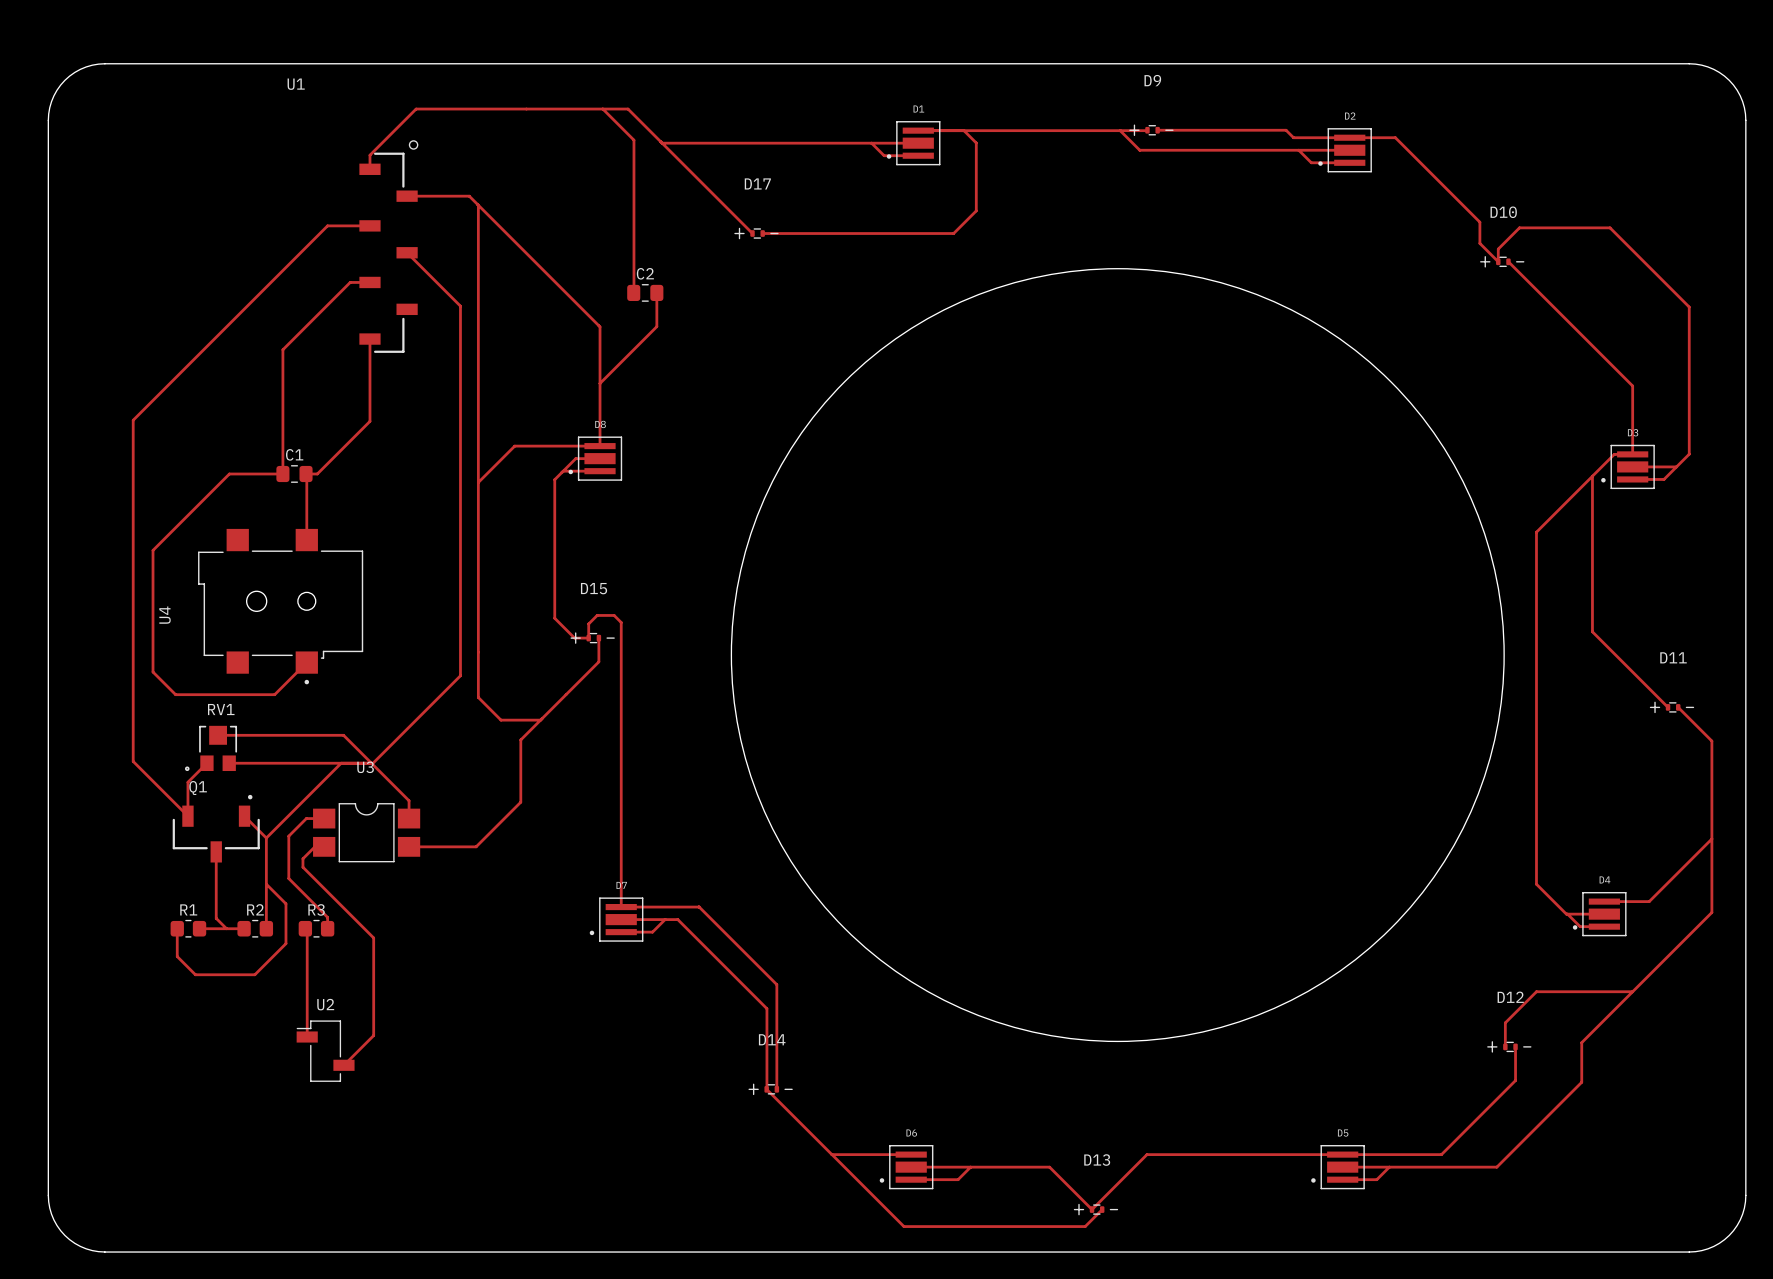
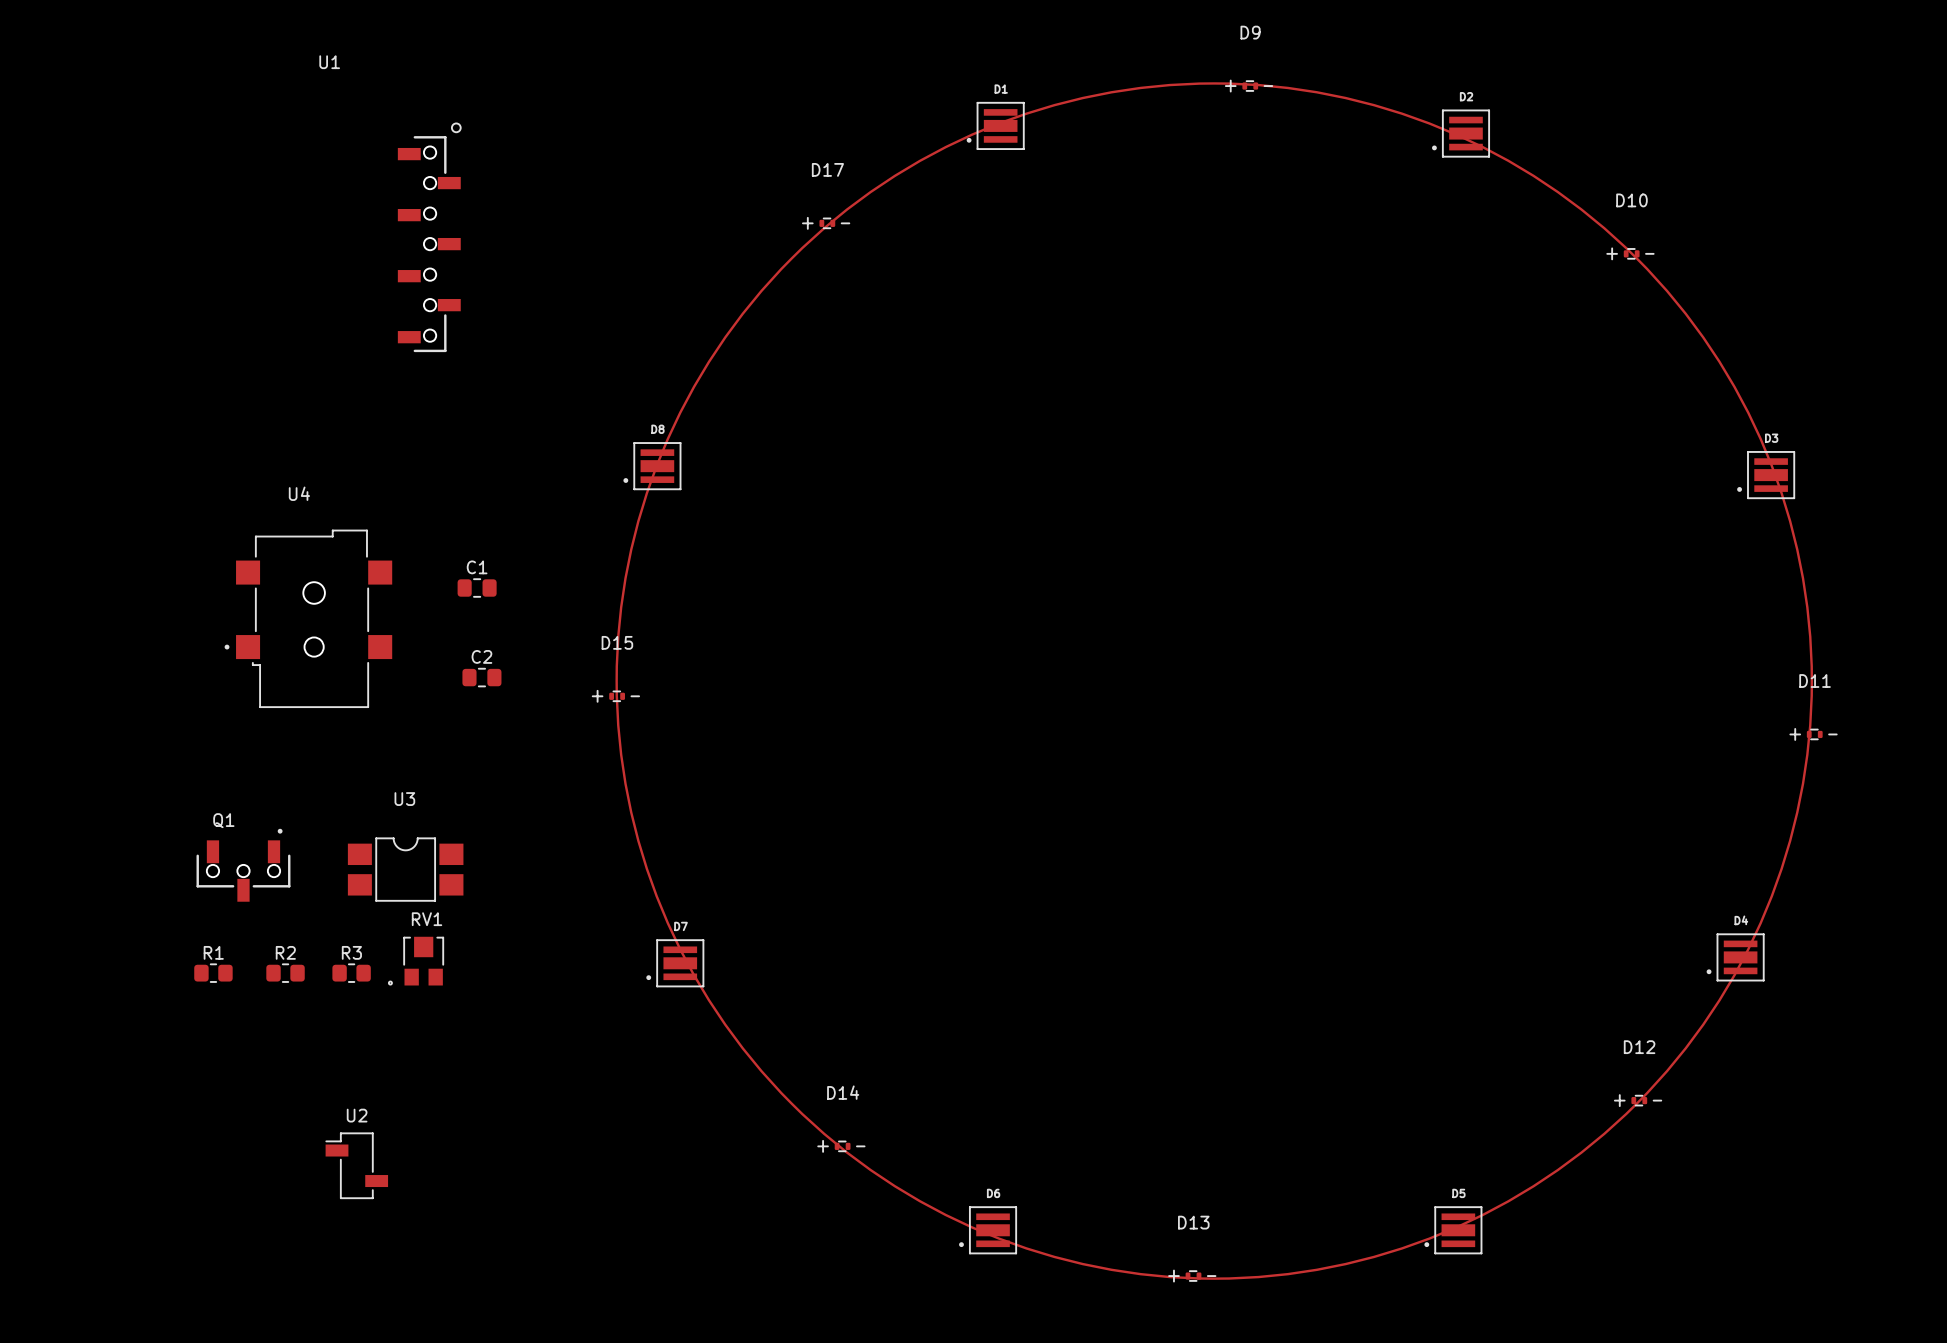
board edge: (104, 63) (1689, 63) (1707, 66) (1724, 76) (1740, 95) (1745, 120) (1745, 1195) (1742, 1214) (1733, 1230) (1713, 1246) (1689, 1252) (104, 1252) (86, 1248) (69, 1239) (53, 1219) (48, 1195) (48, 120) (53, 95) (64, 80) (86, 66) (104, 63) -> none
drawing: none -> [615, 82, 1814, 1280]
track: (602, 109) (633, 140) (633, 292) -> none
track: (963, 130) (976, 142) (976, 210) (953, 233) (762, 233) -> none
track: (1120, 130) (1139, 150) (1349, 150) -> none
track: (1147, 130) (918, 130) -> none
D9 position: (1151, 130) -> (1249, 86)
track: (1157, 130) (1286, 130) (1293, 137) (1395, 137) (1479, 222) (1479, 243) (1498, 261) (1498, 249) (1519, 227) (1610, 227) (1689, 307) (1689, 454) (1663, 479) (1632, 479) -> none
U1 footprint: [359, 140, 419, 353] -> [397, 122, 462, 353]
track: (662, 143) (918, 143) -> none
track: (871, 143) (884, 155) (918, 155) -> none
track: (1298, 150) (1311, 162) (1349, 162) -> none
track: (369, 169) (369, 155) (416, 109) (628, 109) (752, 233) -> none
track: (407, 196) (469, 196) (600, 326) (600, 446) (514, 446) (478, 482) -> none
track: (478, 205) (478, 697) (501, 720) (540, 720) -> none
track: (369, 225) (327, 225) (133, 420) (133, 761) (187, 816) (187, 782) (206, 763) -> none
track: (407, 252) (460, 306) (460, 675) (372, 763) -> none
track: (1508, 261) (1632, 386) (1632, 454) (1614, 454) (1536, 532) (1536, 884) (1566, 914) (1604, 914) -> none
round board edge: [730, 268, 1505, 1042] -> none
track: (369, 282) (350, 282) (282, 349) (282, 473) (229, 473) (153, 550) (153, 672) (175, 694) (274, 694) (306, 662) -> none
C2 position: (645, 292) -> (481, 677)
track: (656, 292) (656, 326) (600, 383) -> none
track: (369, 339) (369, 421) (317, 473) (306, 473) (306, 540) -> none
track: (600, 458) (575, 458) (554, 479) (554, 618) (574, 638) (588, 638) (588, 623) (597, 615) (614, 615) (621, 622) (621, 907) (699, 906) (776, 984) (776, 1089) -> none
track: (1632, 466) (1676, 466) -> none
track: (563, 471) (600, 471) -> none
C1 position: (294, 473) -> (477, 588)
track: (1592, 476) (1592, 631) (1668, 707) -> none
U4 rotation: 0° (280, 606) -> 90° clockwise (308, 618)
D15 position: (592, 638) -> (615, 696)
track: (598, 638) (598, 661) (520, 739) (520, 802) (476, 846) (409, 846) -> none
track: (1678, 707) (1711, 741) (1711, 912) (1581, 1042) (1581, 1082) (1496, 1167) (1342, 1167) -> none
track: (218, 735) (343, 735) (409, 800) (409, 818) -> none
RV1 position: (211, 748) -> (416, 961)
track: (229, 763) (371, 763) -> none
track: (341, 763) (266, 838) -> none
Q1 footprint: [172, 794, 260, 863] -> [196, 828, 291, 902]
track: (244, 816) (266, 838) -> none
track: (324, 818) (306, 818) (288, 836) (288, 878) (327, 917) (327, 928) -> none
track: (266, 838) (266, 928) -> none
track: (1711, 838) (1649, 901) (1604, 901) -> none
track: (324, 846) (314, 846) (302, 858) (302, 867) (373, 937) (373, 1035) (343, 1065) -> none
track: (216, 851) (216, 918) (226, 928) -> none
track: (266, 884) (285, 903) (285, 943) (254, 974) (195, 974) (177, 956) (177, 928) -> none
track: (1567, 914) (1580, 926) (1604, 926) -> none
track: (621, 919) (677, 919) (766, 1008) (766, 1089) (831, 1154) (911, 1154) -> none
track: (665, 919) (652, 932) (621, 932) -> none
track: (199, 928) (244, 928) -> none
track: (302, 931) (305, 928) (307, 930) (307, 1037) -> none
track: (1632, 991) (1536, 991) (1505, 1022) (1505, 1046) -> none
track: (1515, 1046) (1515, 1080) (1441, 1154) (1146, 1154) (1092, 1209) (1049, 1167) (911, 1167) -> none
U2 position: (325, 1051) -> (356, 1165)
track: (832, 1154) (903, 1226) (1085, 1226) (1102, 1209) -> none
track: (970, 1167) (958, 1179) (911, 1179) -> none
track: (1389, 1167) (1376, 1179) (1342, 1179) -> none

